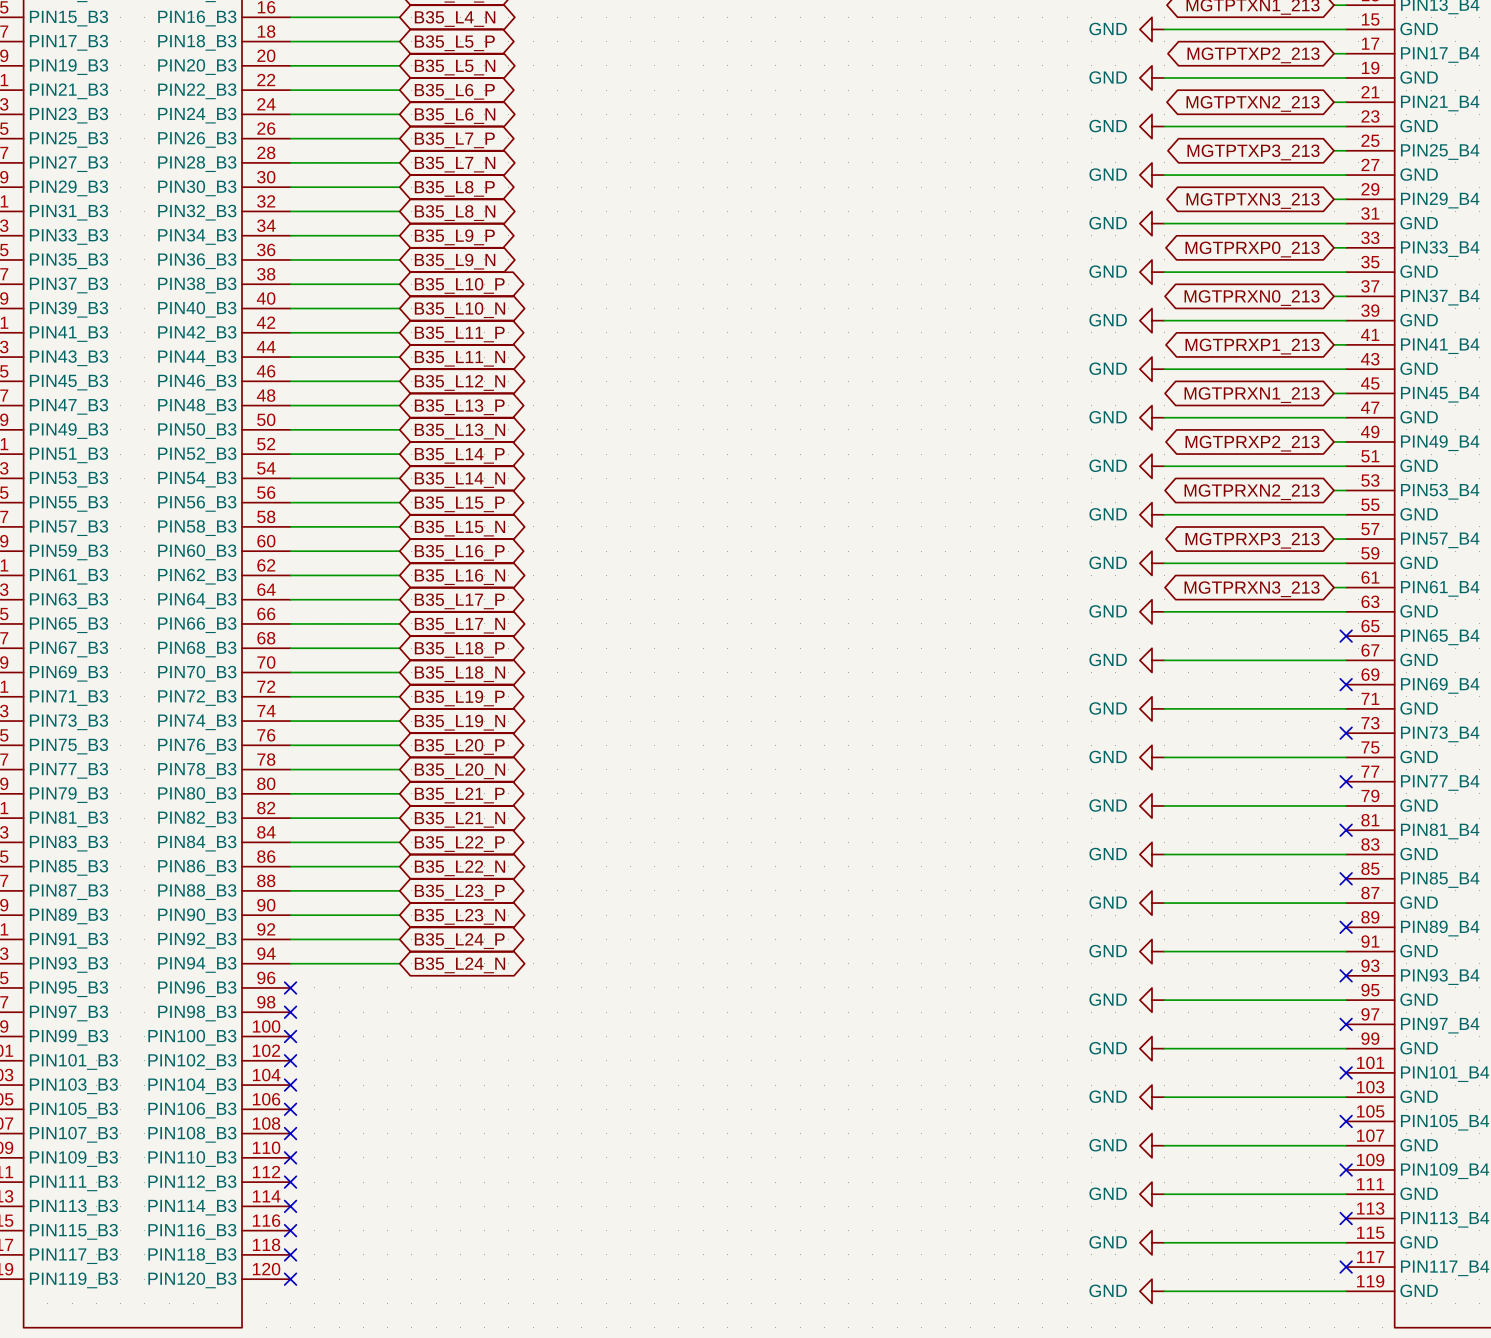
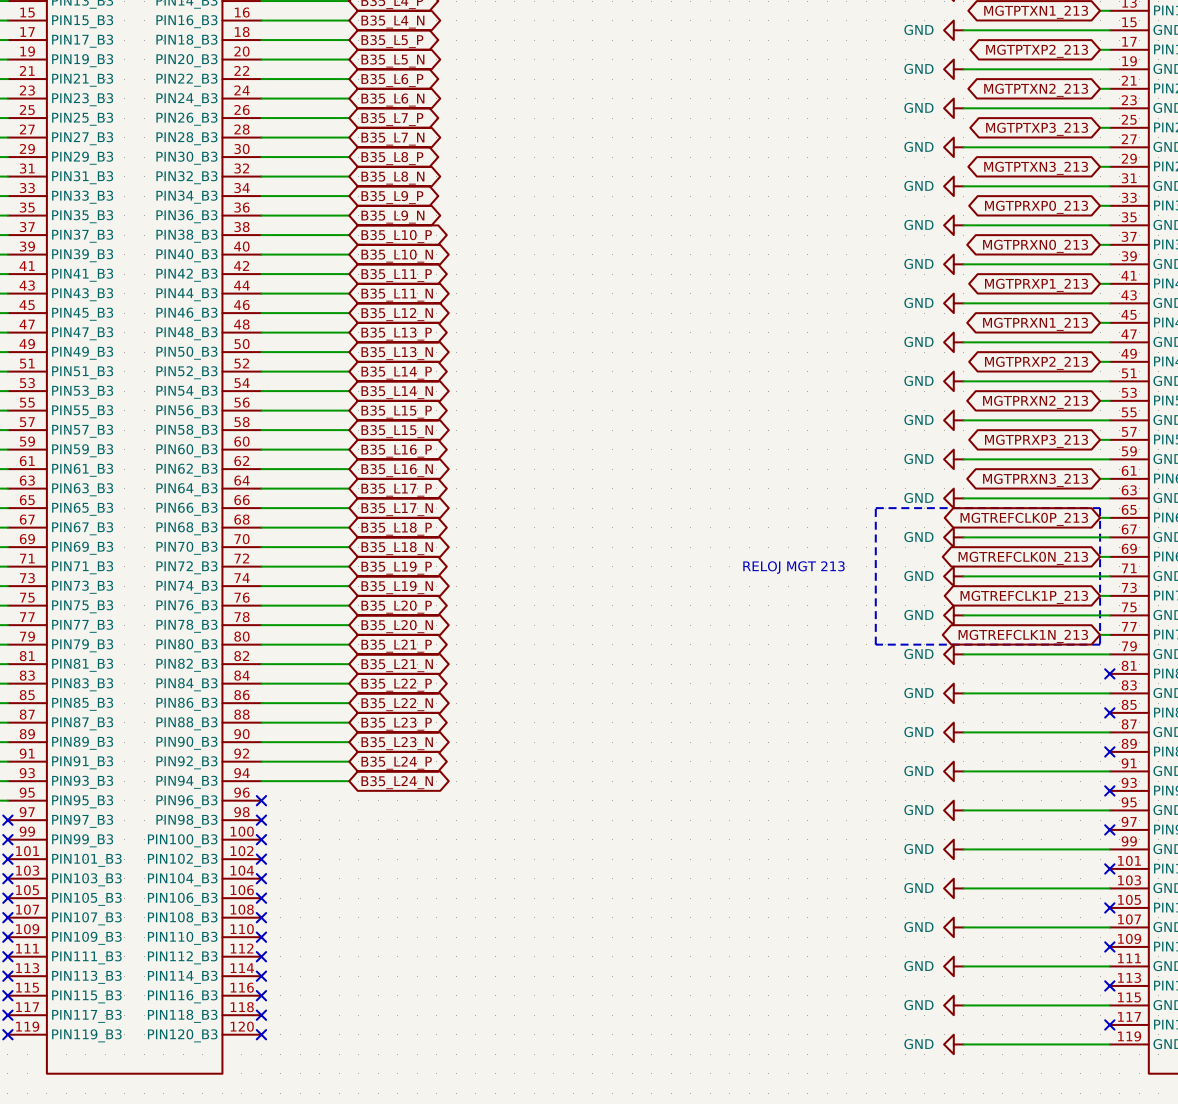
line: none -> (875, 508) (1100, 508) (1100, 644) (875, 644) (875, 508)
wire: none -> (1100, 517) (1109, 517)
no-connect mark: (1346, 636) -> none
global label: none -> MGTREFCLK0P_213 (1024, 519)
wire: none -> (1100, 556) (1109, 556)
no-connect mark: (1346, 684) -> none
global label: none -> MGTREFCLK0N_213 (1023, 558)
text: none -> RELOJ MGT 213 (793, 567)
wire: none -> (1100, 595) (1109, 595)
no-connect mark: (1346, 733) -> none
global label: none -> MGTREFCLK1P_213 (1024, 597)
wire: none -> (1100, 634) (1109, 634)
no-connect mark: (1346, 781) -> none
global label: none -> MGTREFCLK1N_213 (1023, 636)

